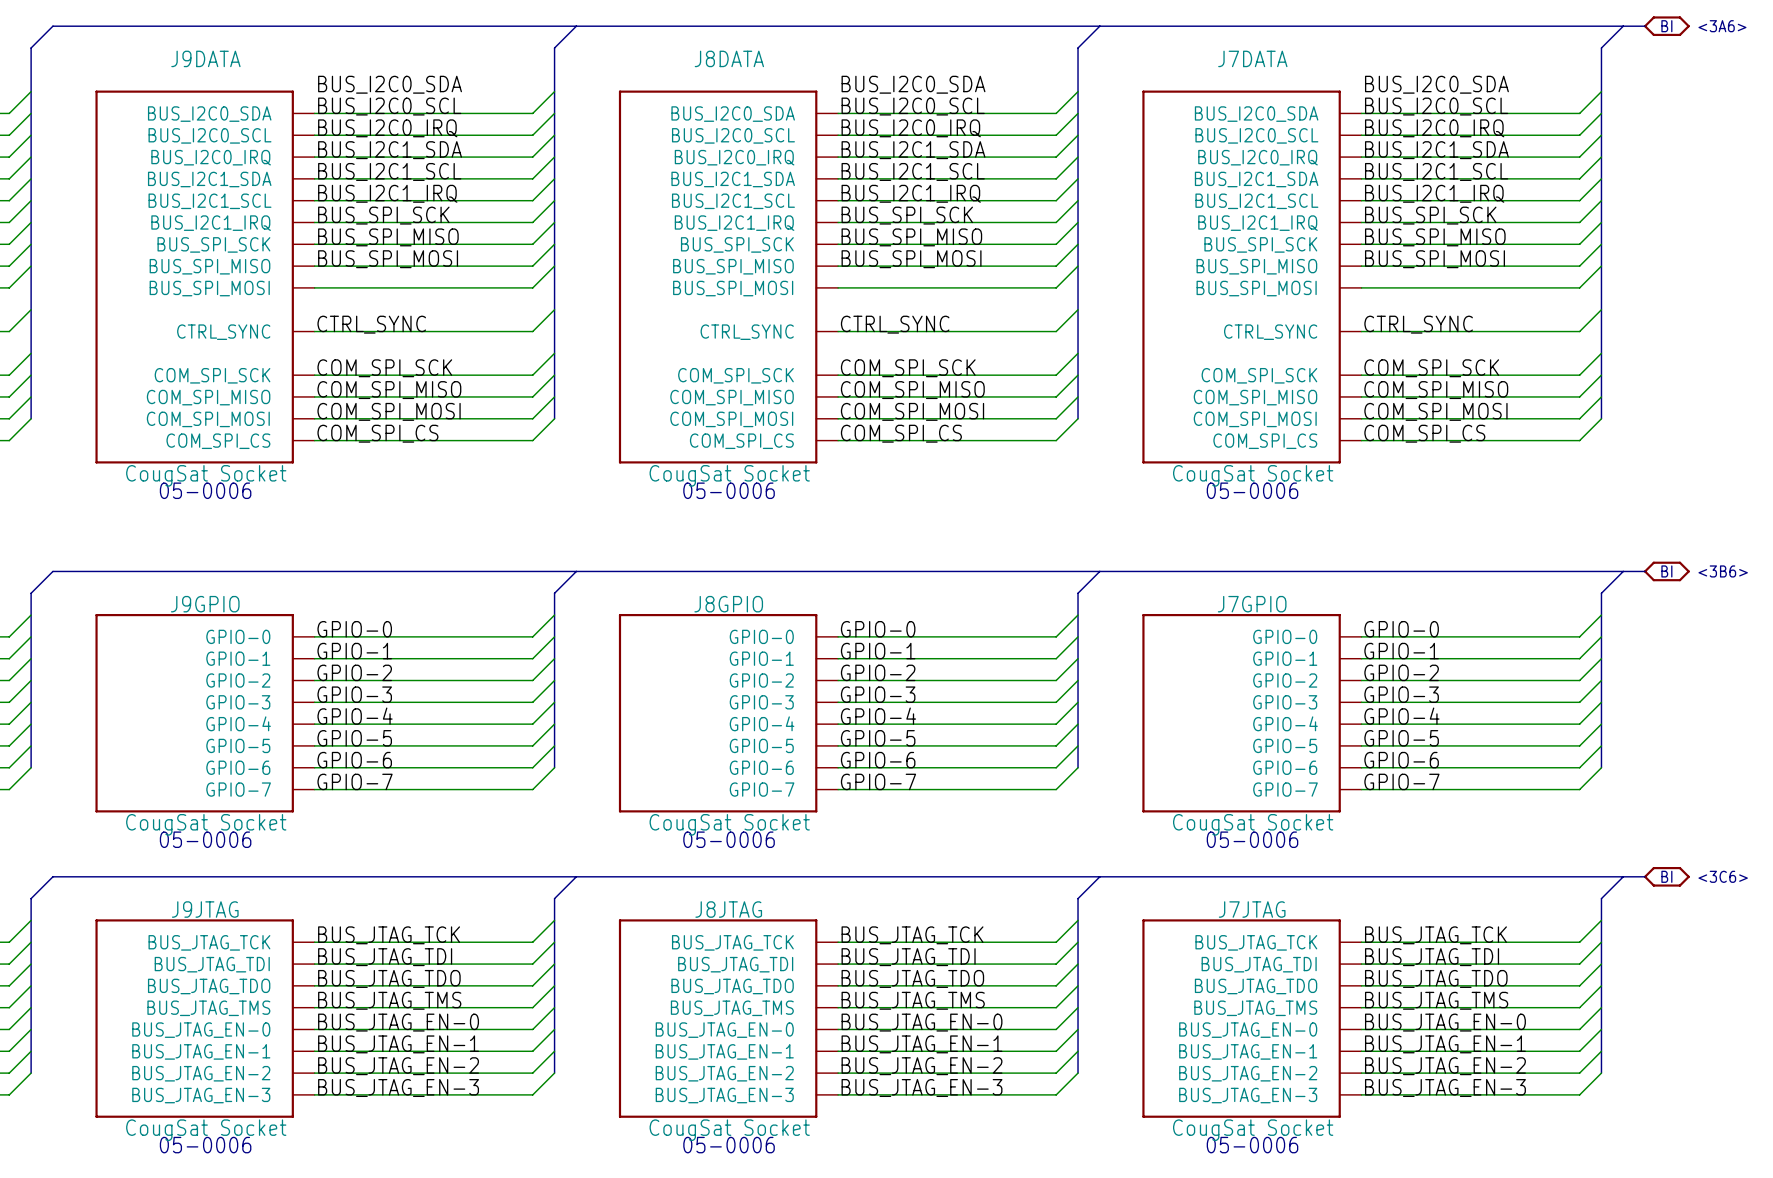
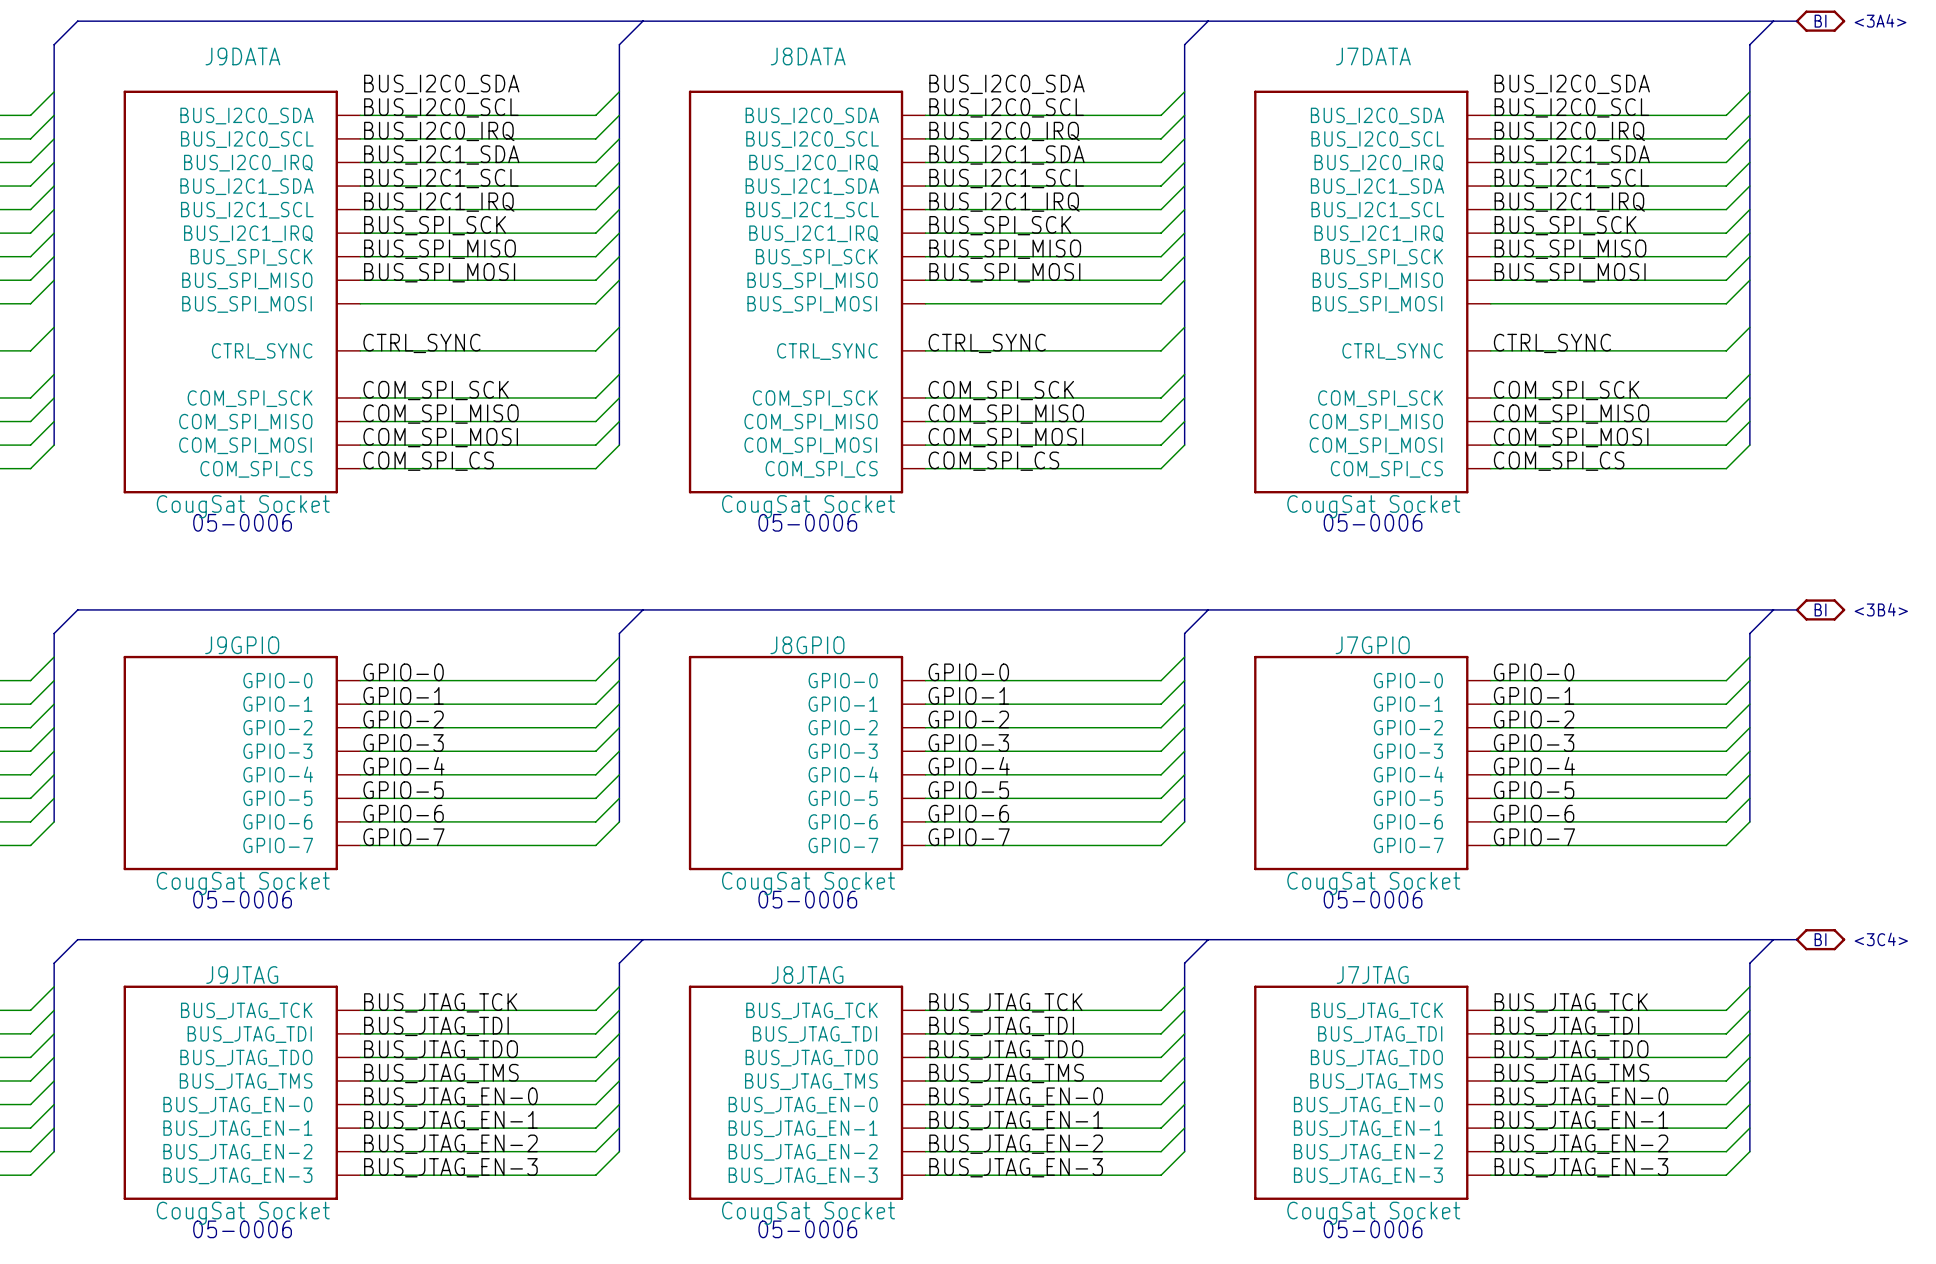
text: <3A6> (1722, 26) -> <3A4> (1880, 20)
text: <3B6> (1723, 571) -> <3B4> (1881, 609)
text: <3C6> (1723, 876) -> <3C4> (1881, 939)

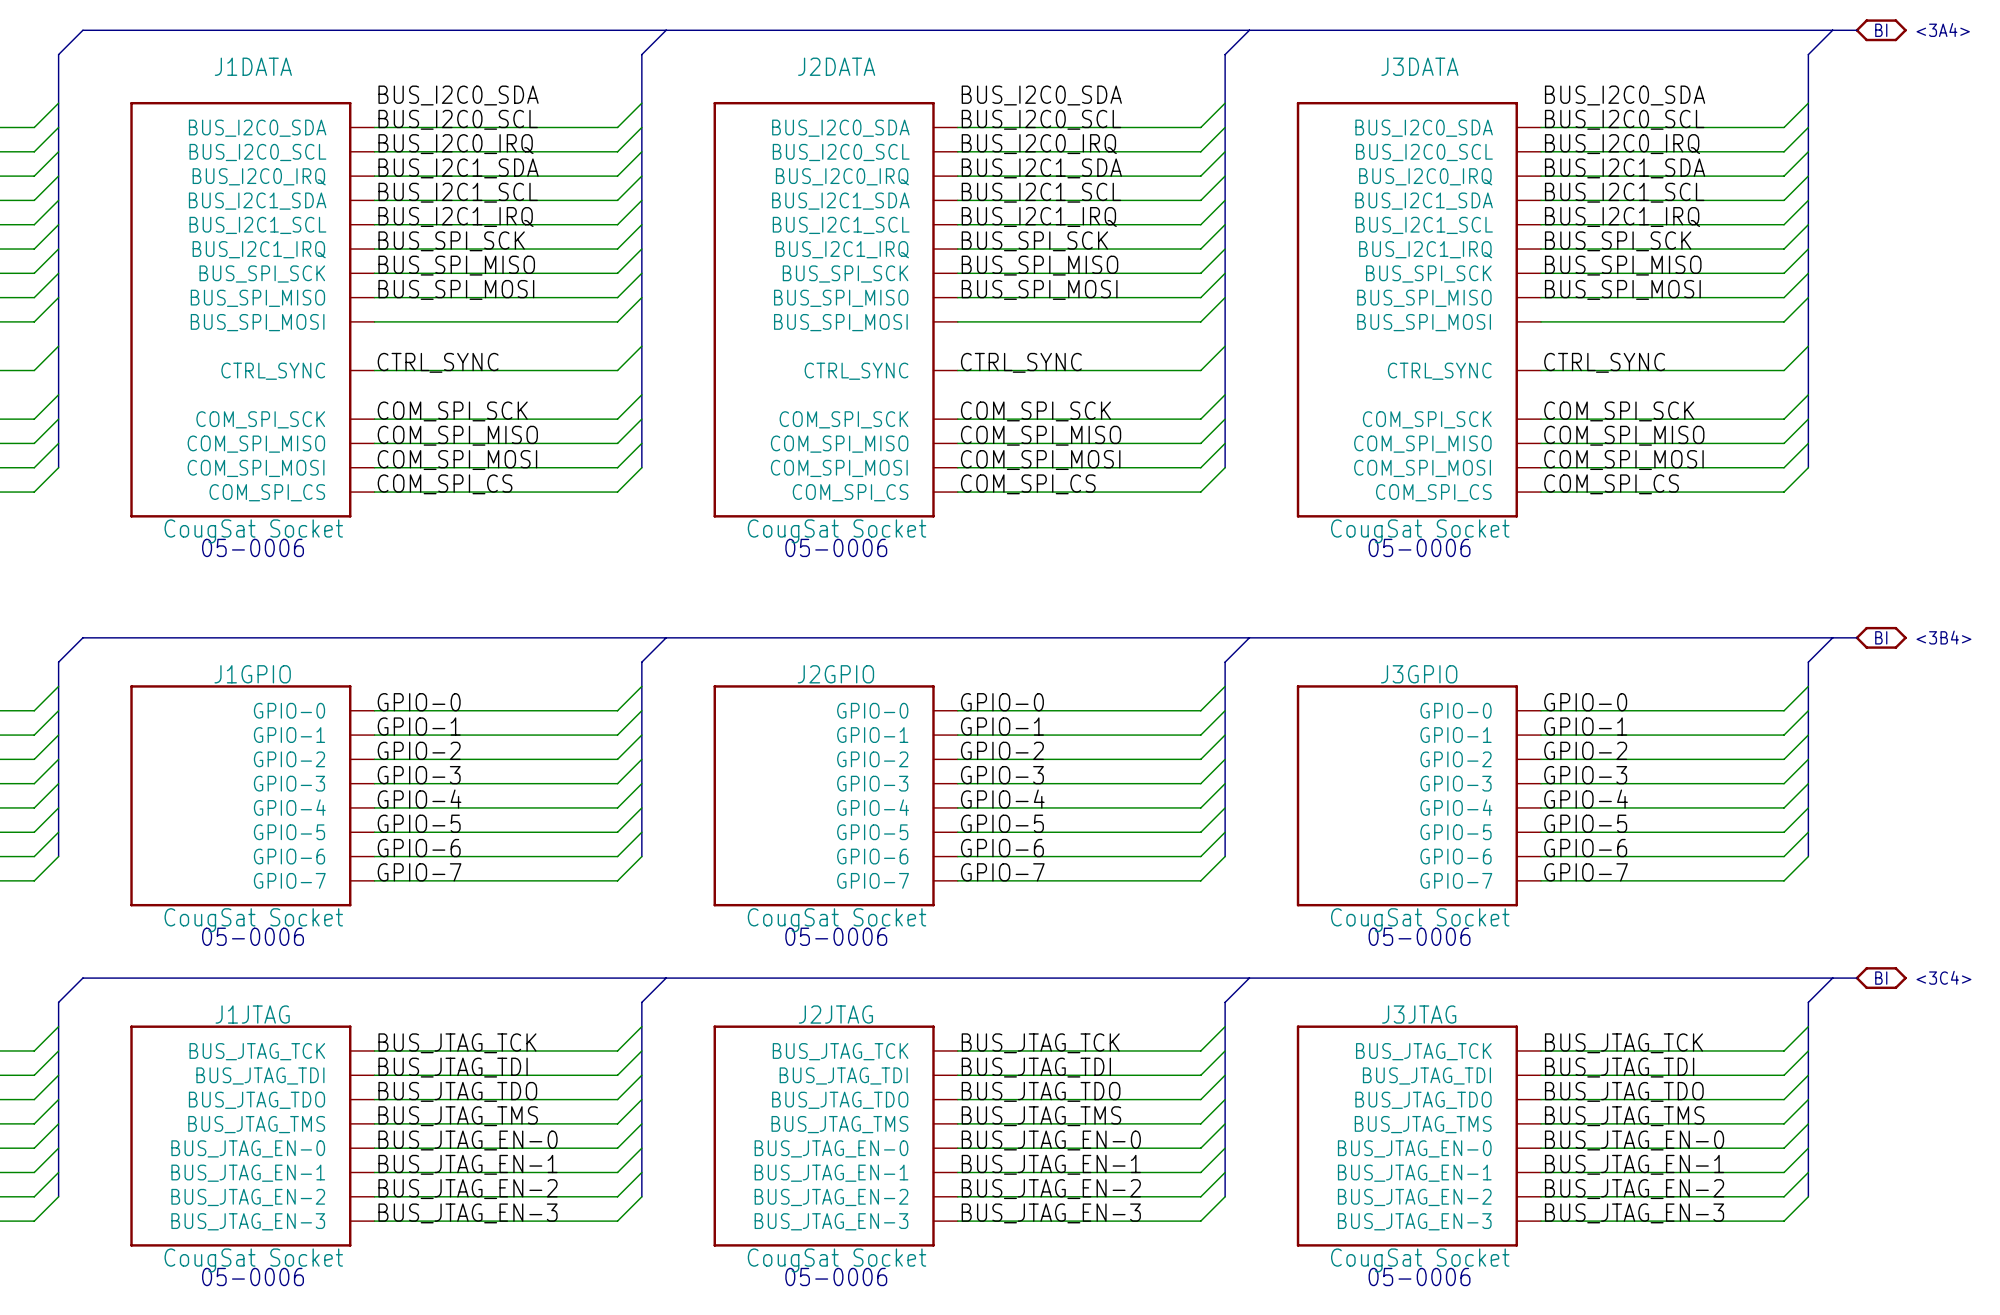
J9DATA name: J9DATA (242, 56) -> J1DATA (253, 66)
J8DATA name: J8DATA (808, 56) -> J2DATA (836, 66)
J7DATA name: J7DATA (1373, 56) -> J3DATA (1419, 66)
J9GPIO name: J9GPIO (242, 645) -> J1GPIO (252, 674)
J8GPIO name: J8GPIO (807, 645) -> J2GPIO (835, 674)
J7GPIO name: J7GPIO (1372, 645) -> J3GPIO (1419, 674)
J9JTAG name: J9JTAG (242, 975) -> J1JTAG (252, 1014)
J8JTAG name: J8JTAG (807, 975) -> J2JTAG (835, 1014)
J7JTAG name: J7JTAG (1372, 975) -> J3JTAG (1419, 1014)

